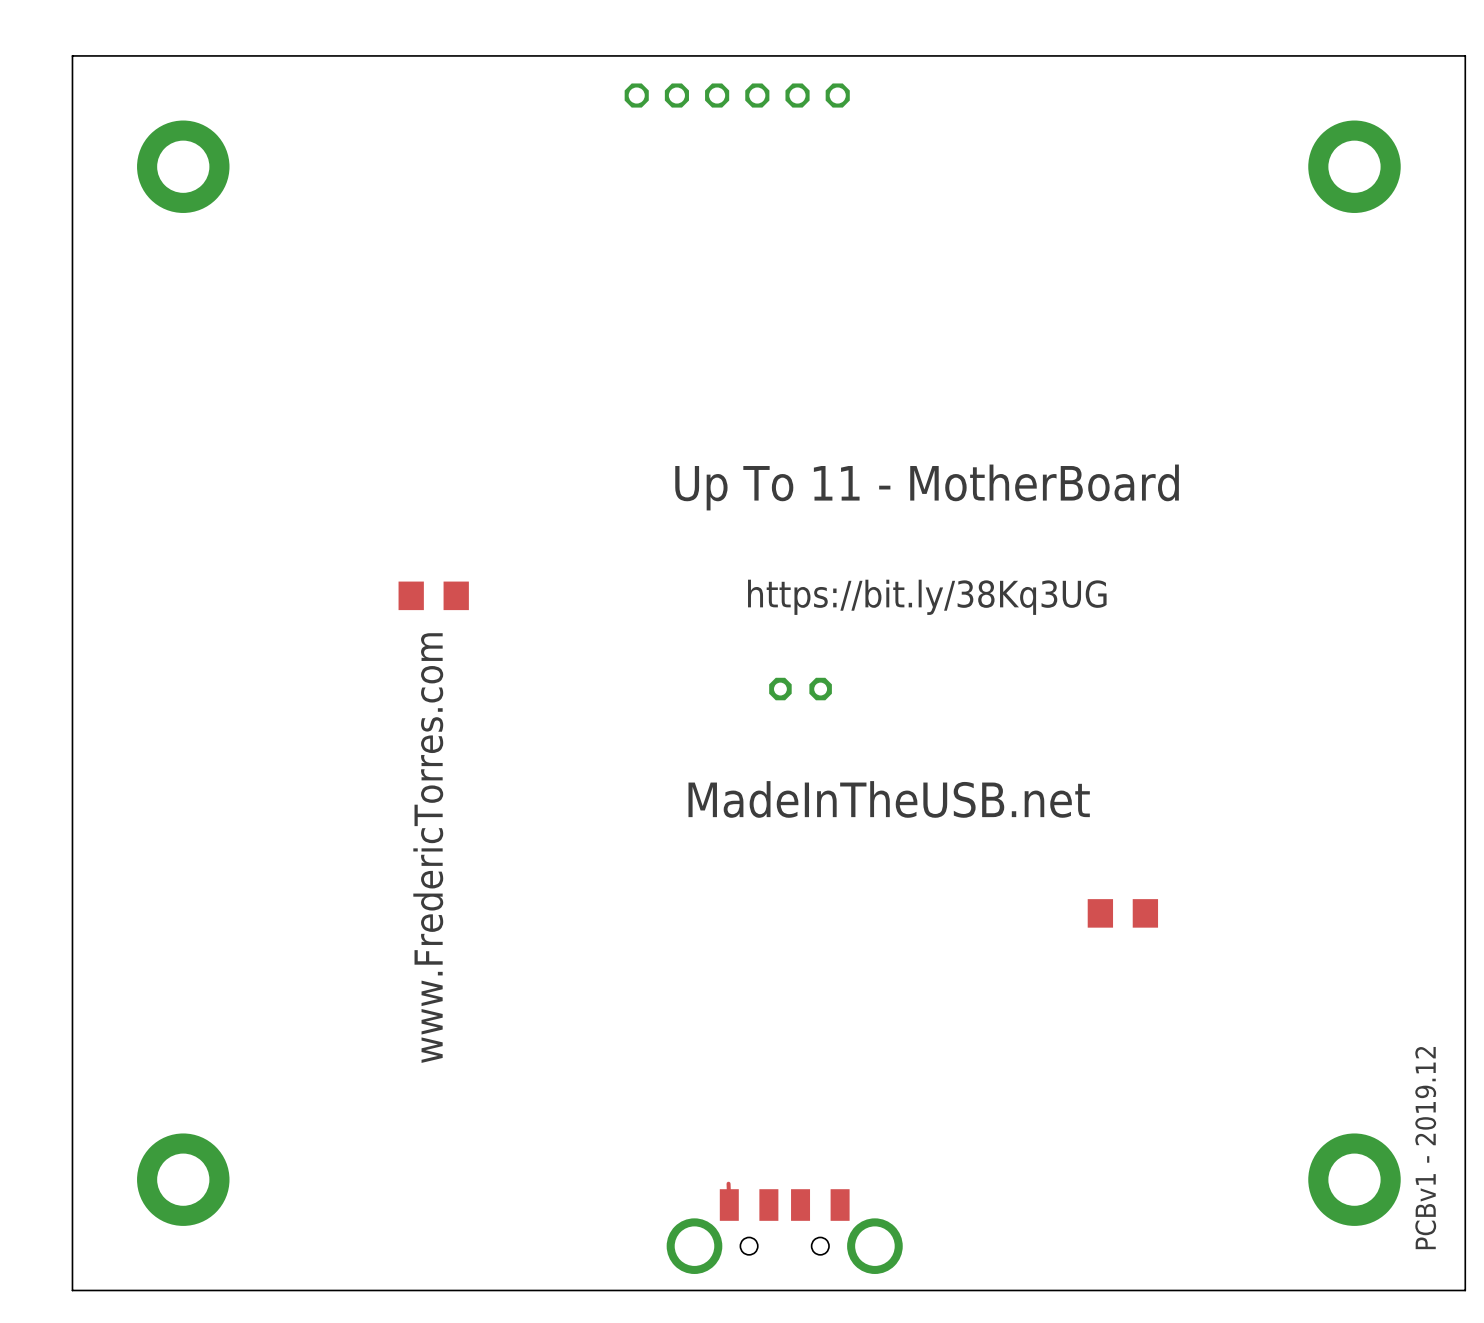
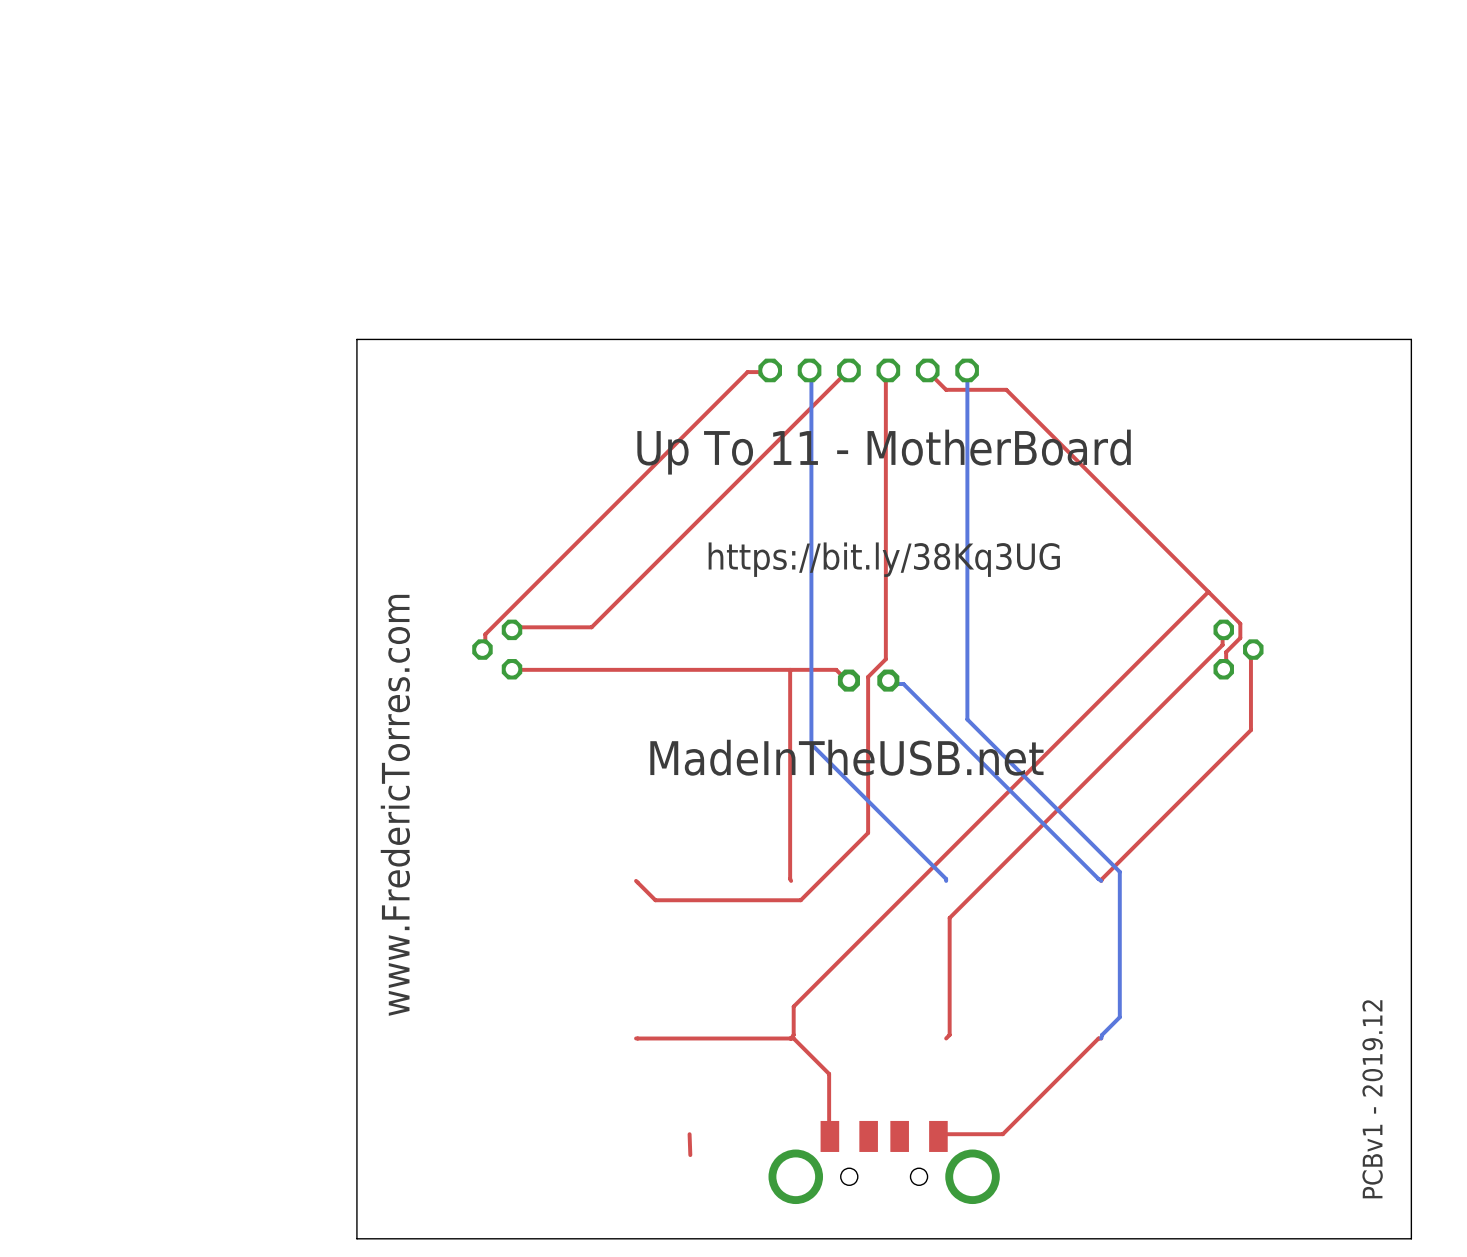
part position: (737, 95) -> (868, 370)
part: (183, 166) -> none
part: (1354, 166) -> none
board edge: (1465, 372) (1465, 55) (72, 55) (72, 1290) (389, 1290) -> (1411, 339) (356, 339) (356, 1238)
top track: none -> (770, 370) (768, 372) (747, 372) (485, 634) (485, 648) (482, 649)
bottom track: none -> (809, 370) (811, 372) (811, 744) (946, 880)
top track: none -> (848, 370) (591, 627) (513, 627) (512, 629)
top track: none -> (888, 370) (885, 372) (885, 659) (868, 676) (868, 832) (800, 900) (655, 900) (636, 880)
top track: none -> (927, 370) (946, 389) (1006, 389) (1240, 623) (1240, 637) (1226, 652) (1226, 666) (1223, 669)
bottom track: none -> (967, 370) (967, 719) (1119, 871) (1119, 1017) (1102, 1034) (1101, 1038)
part: (433, 595) -> none
top track: none -> (1208, 591) (793, 1006) (793, 1034) (791, 1038)
top track: none -> (1223, 629) (1222, 645) (949, 917) (949, 1034) (946, 1038)
part: none -> (497, 649)
part position: (800, 689) -> (868, 680)
part: none -> (1238, 649)
top track: none -> (1253, 649) (1250, 652) (1250, 730) (1101, 880)
top track: none -> (512, 669) (836, 669) (848, 680)
top track: none -> (790, 669) (791, 880)
bottom track: none -> (888, 680) (889, 684) (903, 684) (1101, 880)
part: (1122, 913) -> none
top track: none -> (791, 1038) (793, 1038) (829, 1073) (829, 1136)
top track: none -> (791, 1038) (636, 1038)
top track: none -> (1101, 1038) (1098, 1038) (1002, 1134) (939, 1134) (938, 1136)
part: (183, 1179) -> none
part: (1354, 1179) -> none
part position: (784, 1231) -> (884, 1162)

